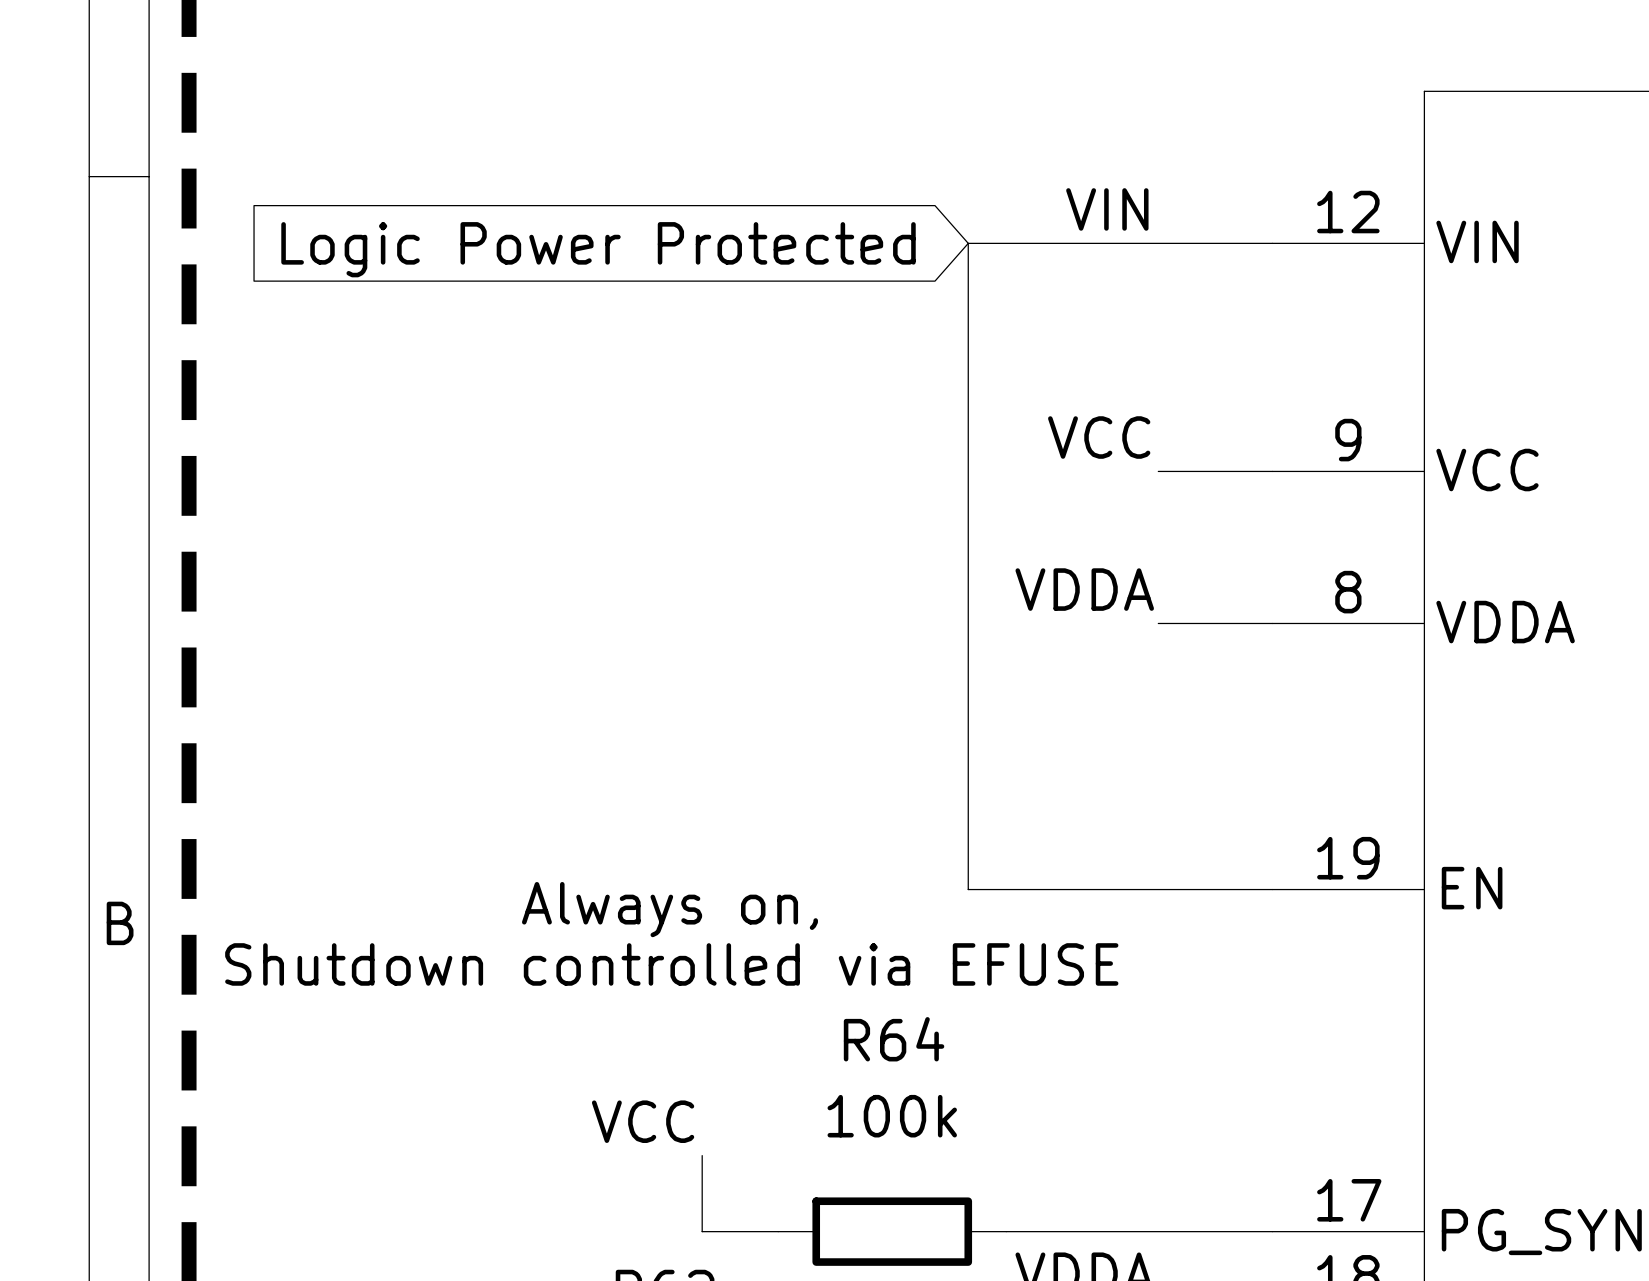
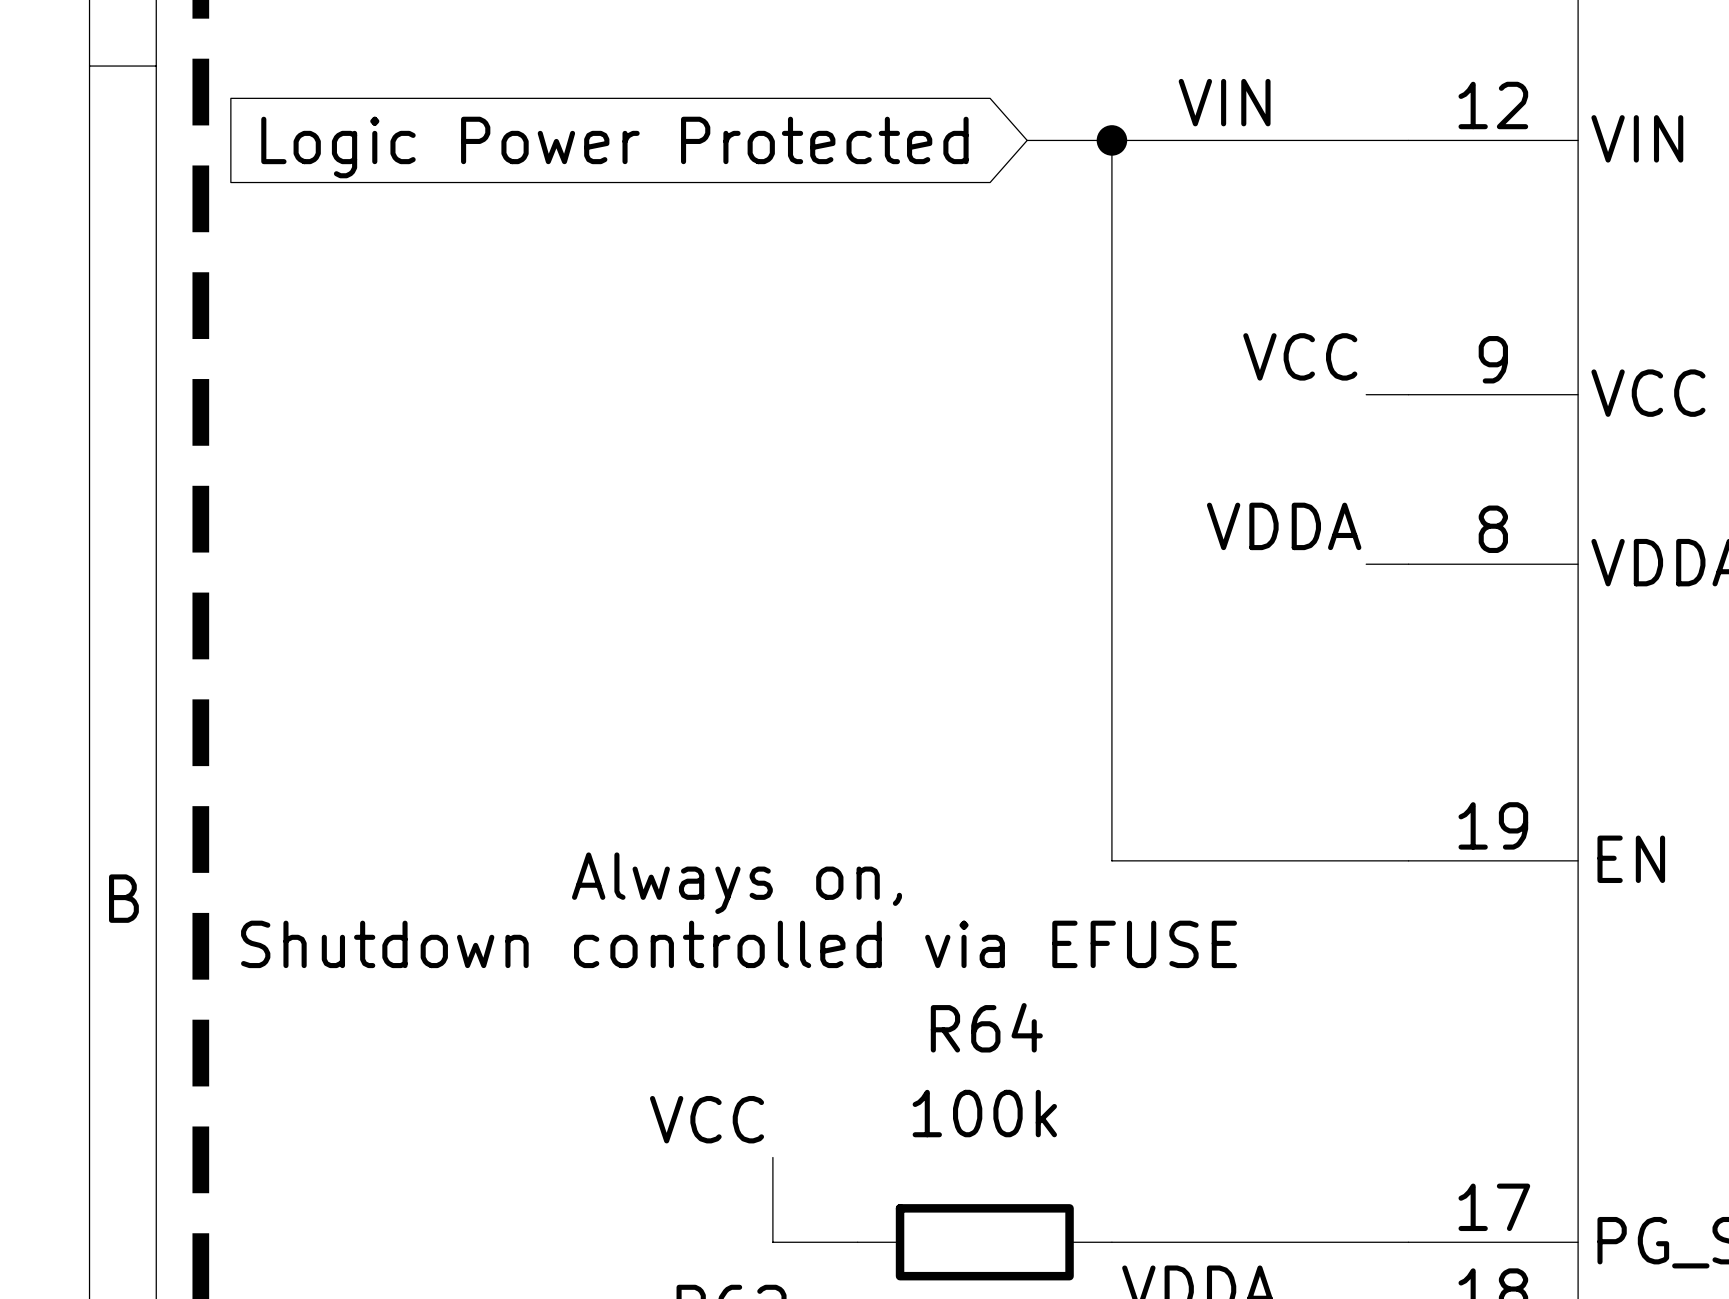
wire: none -> (1027, 140) (1069, 140)
wire: (968, 243) (968, 889) (1006, 889) -> (1111, 140) (1111, 860)
junction: none -> (1111, 140)
global label position: Logic Power Protected (598, 249) -> Logic Power Protected (614, 147)
label position: VCC (1099, 437) -> VCC (1300, 356)
wire: (1158, 471) (1234, 471) -> none
label position: VDDA (1084, 589) -> VDDA (1284, 526)
wire: (1158, 623) (1234, 623) -> none

